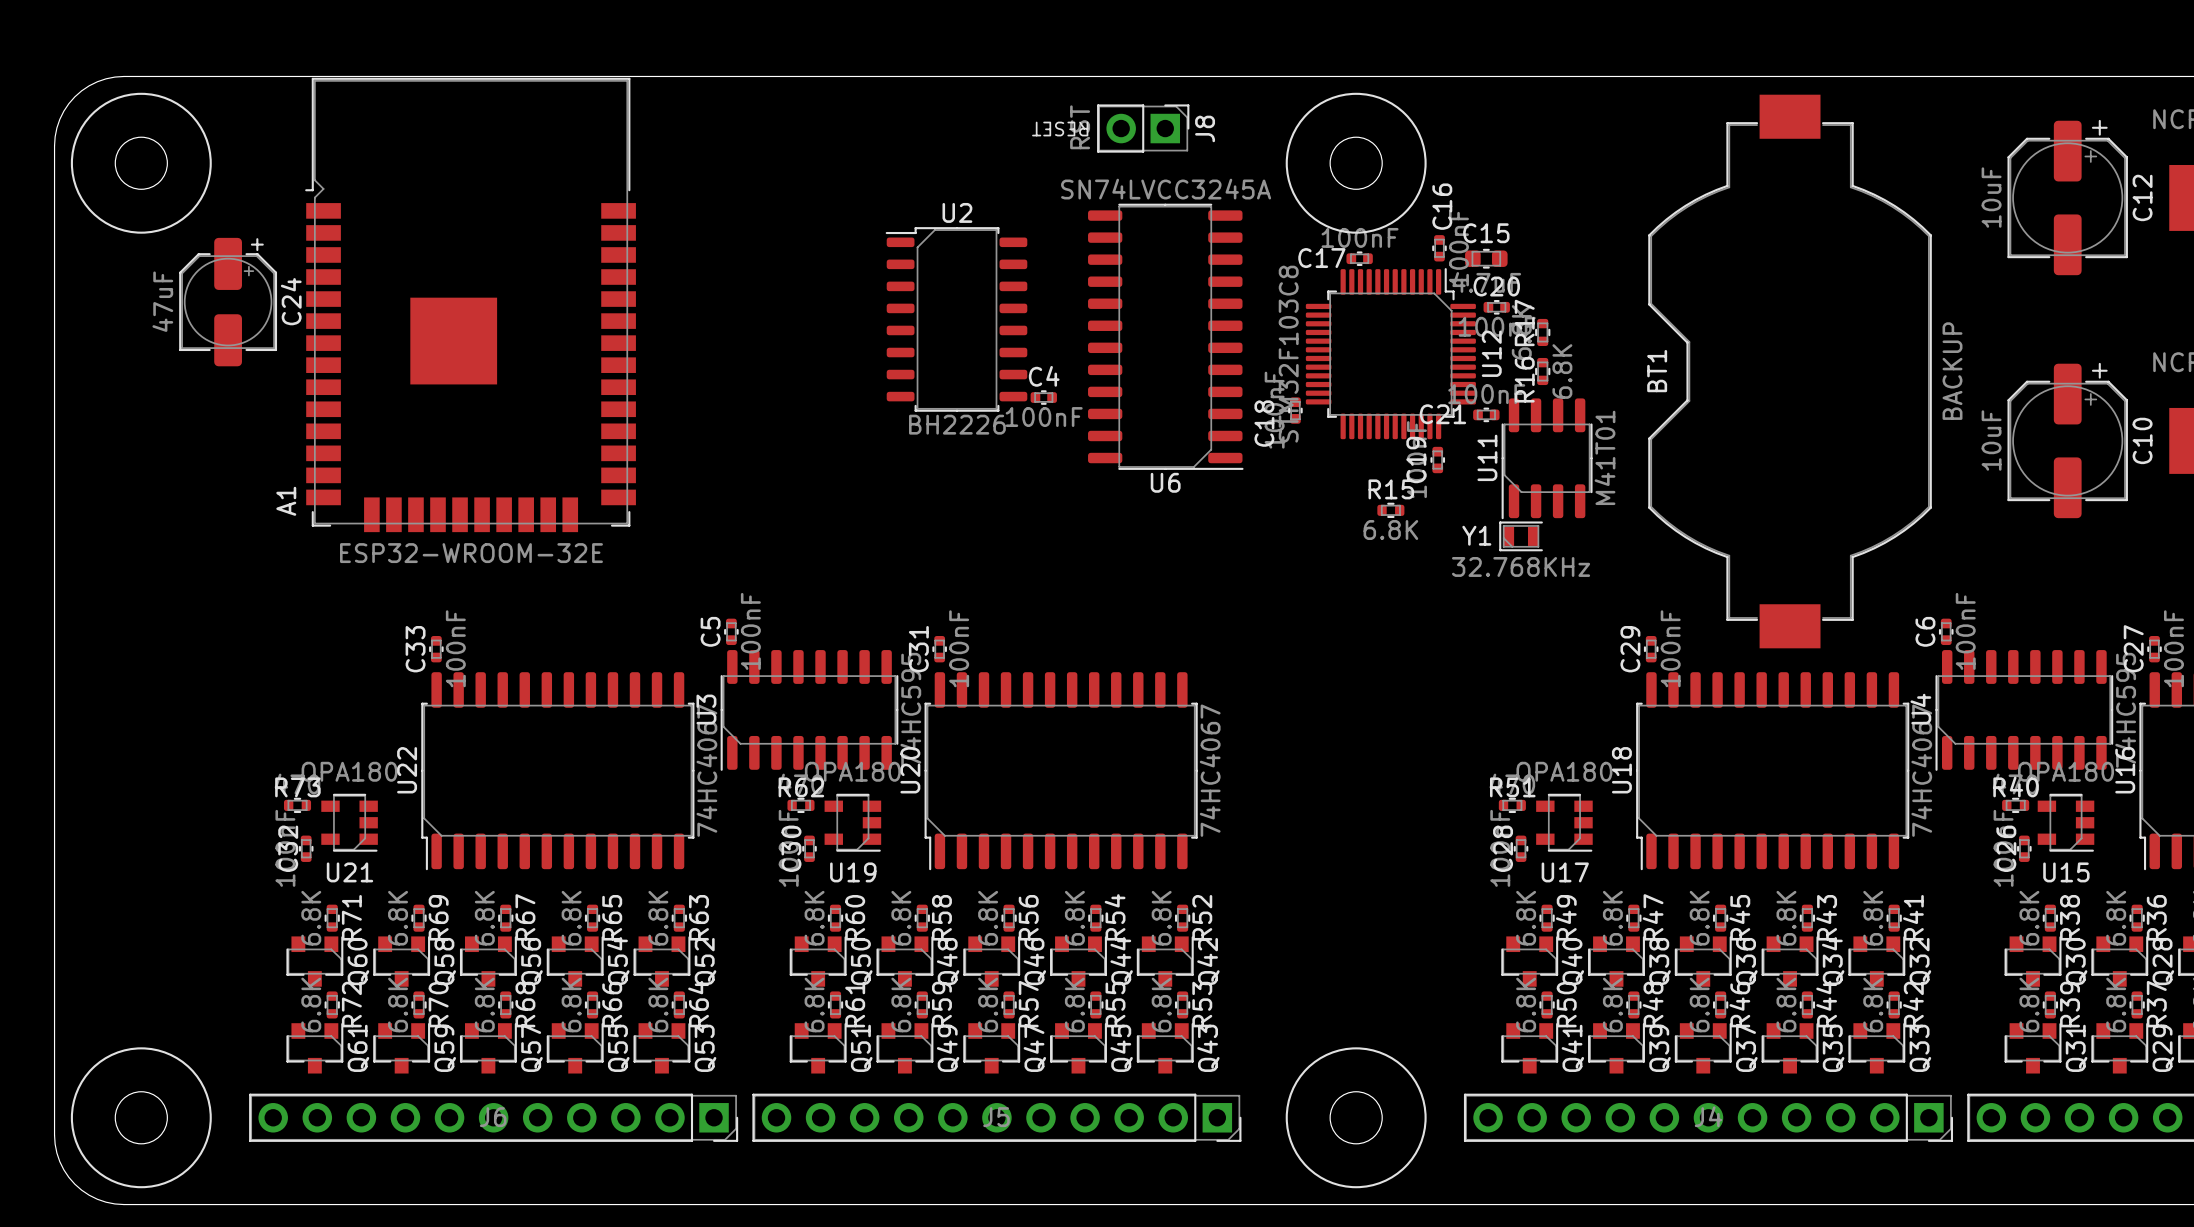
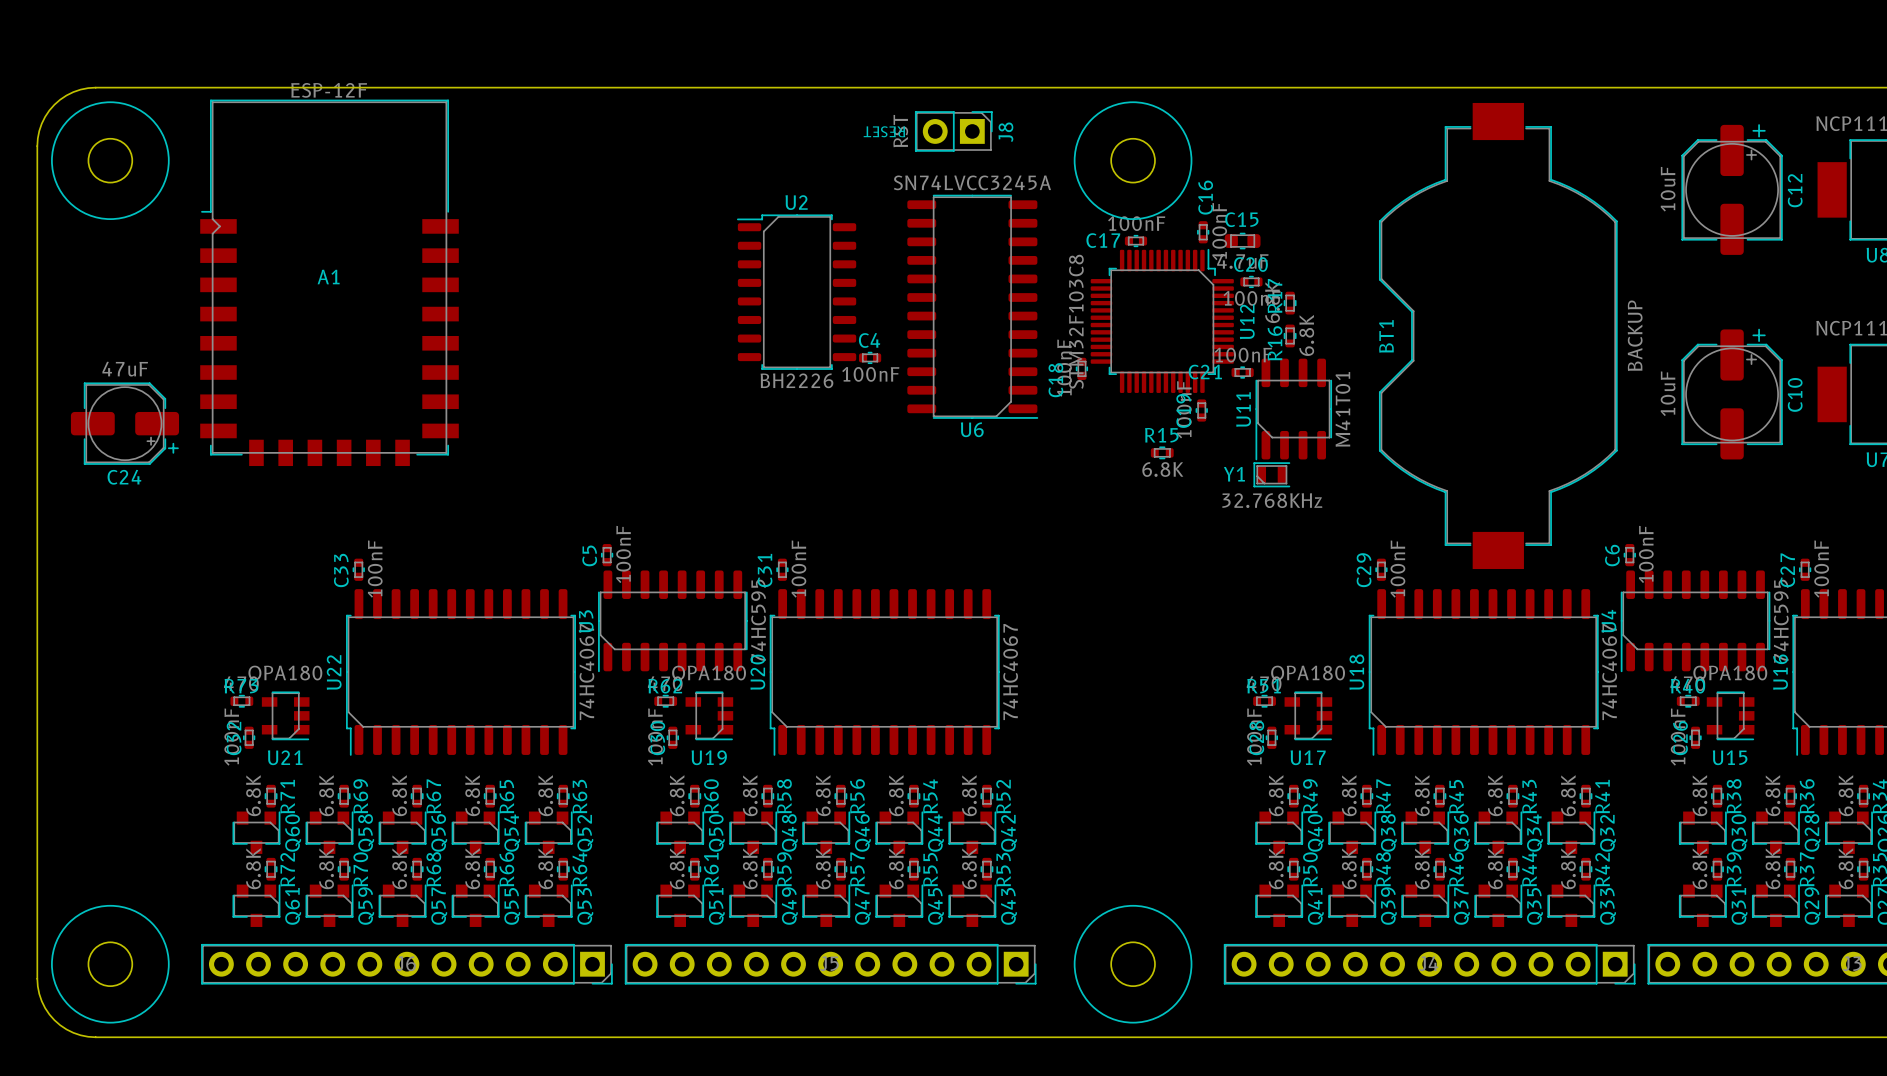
A1 footprint: [305, 77, 636, 533] -> [200, 99, 459, 467]
C24 rotation: 0° (228, 302) -> 90° clockwise (124, 423)
C24 position: (228, 302) -> (124, 423)
A1 name position: A1 (286, 501) -> A1 (328, 277)
A1 value: ESP32-WROOM-32E (471, 553) -> ESP-12F (329, 90)

